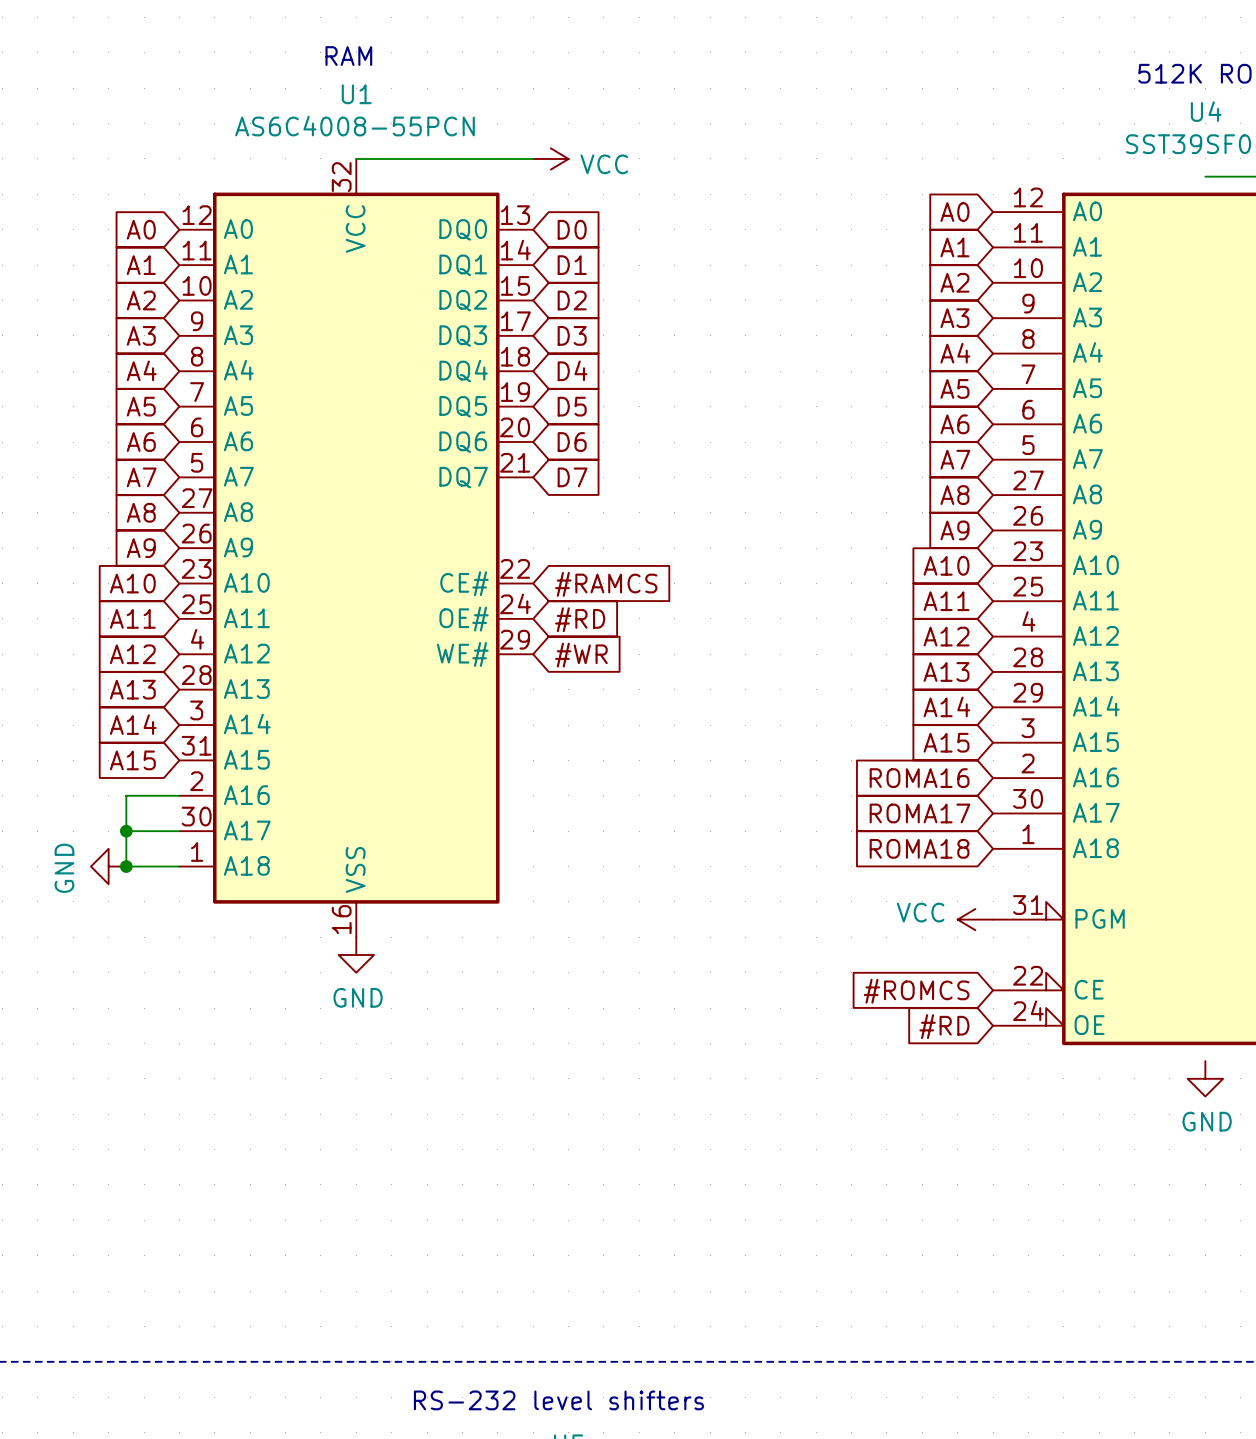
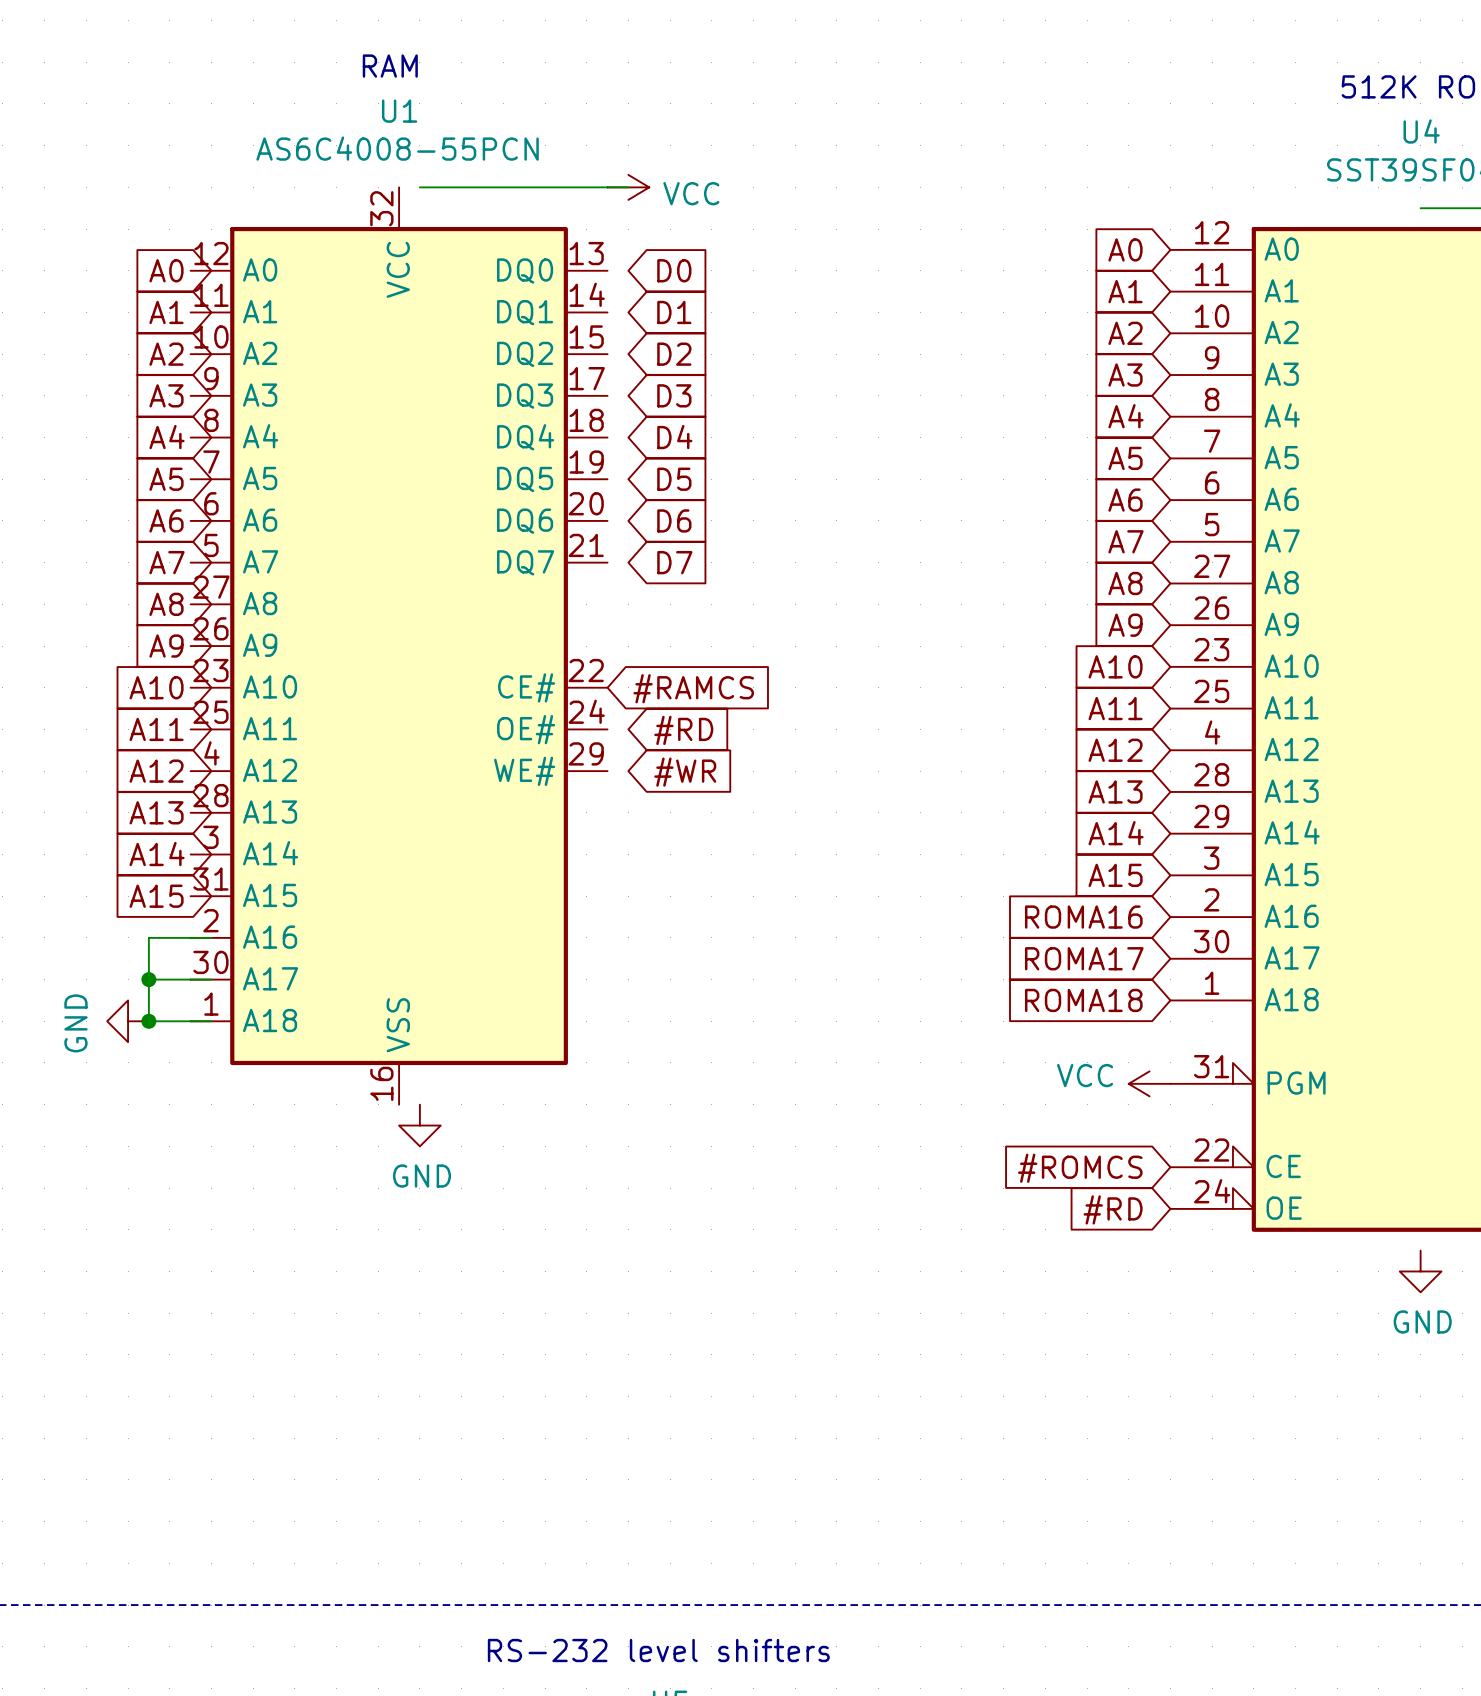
text position: RAM (348, 56) -> RAM (390, 66)
power symbol position: VCC (550, 158) -> VCC (628, 187)
U1 position: (356, 548) -> (399, 646)
global label position: #RAMCS (606, 584) -> #RAMCS (693, 688)

